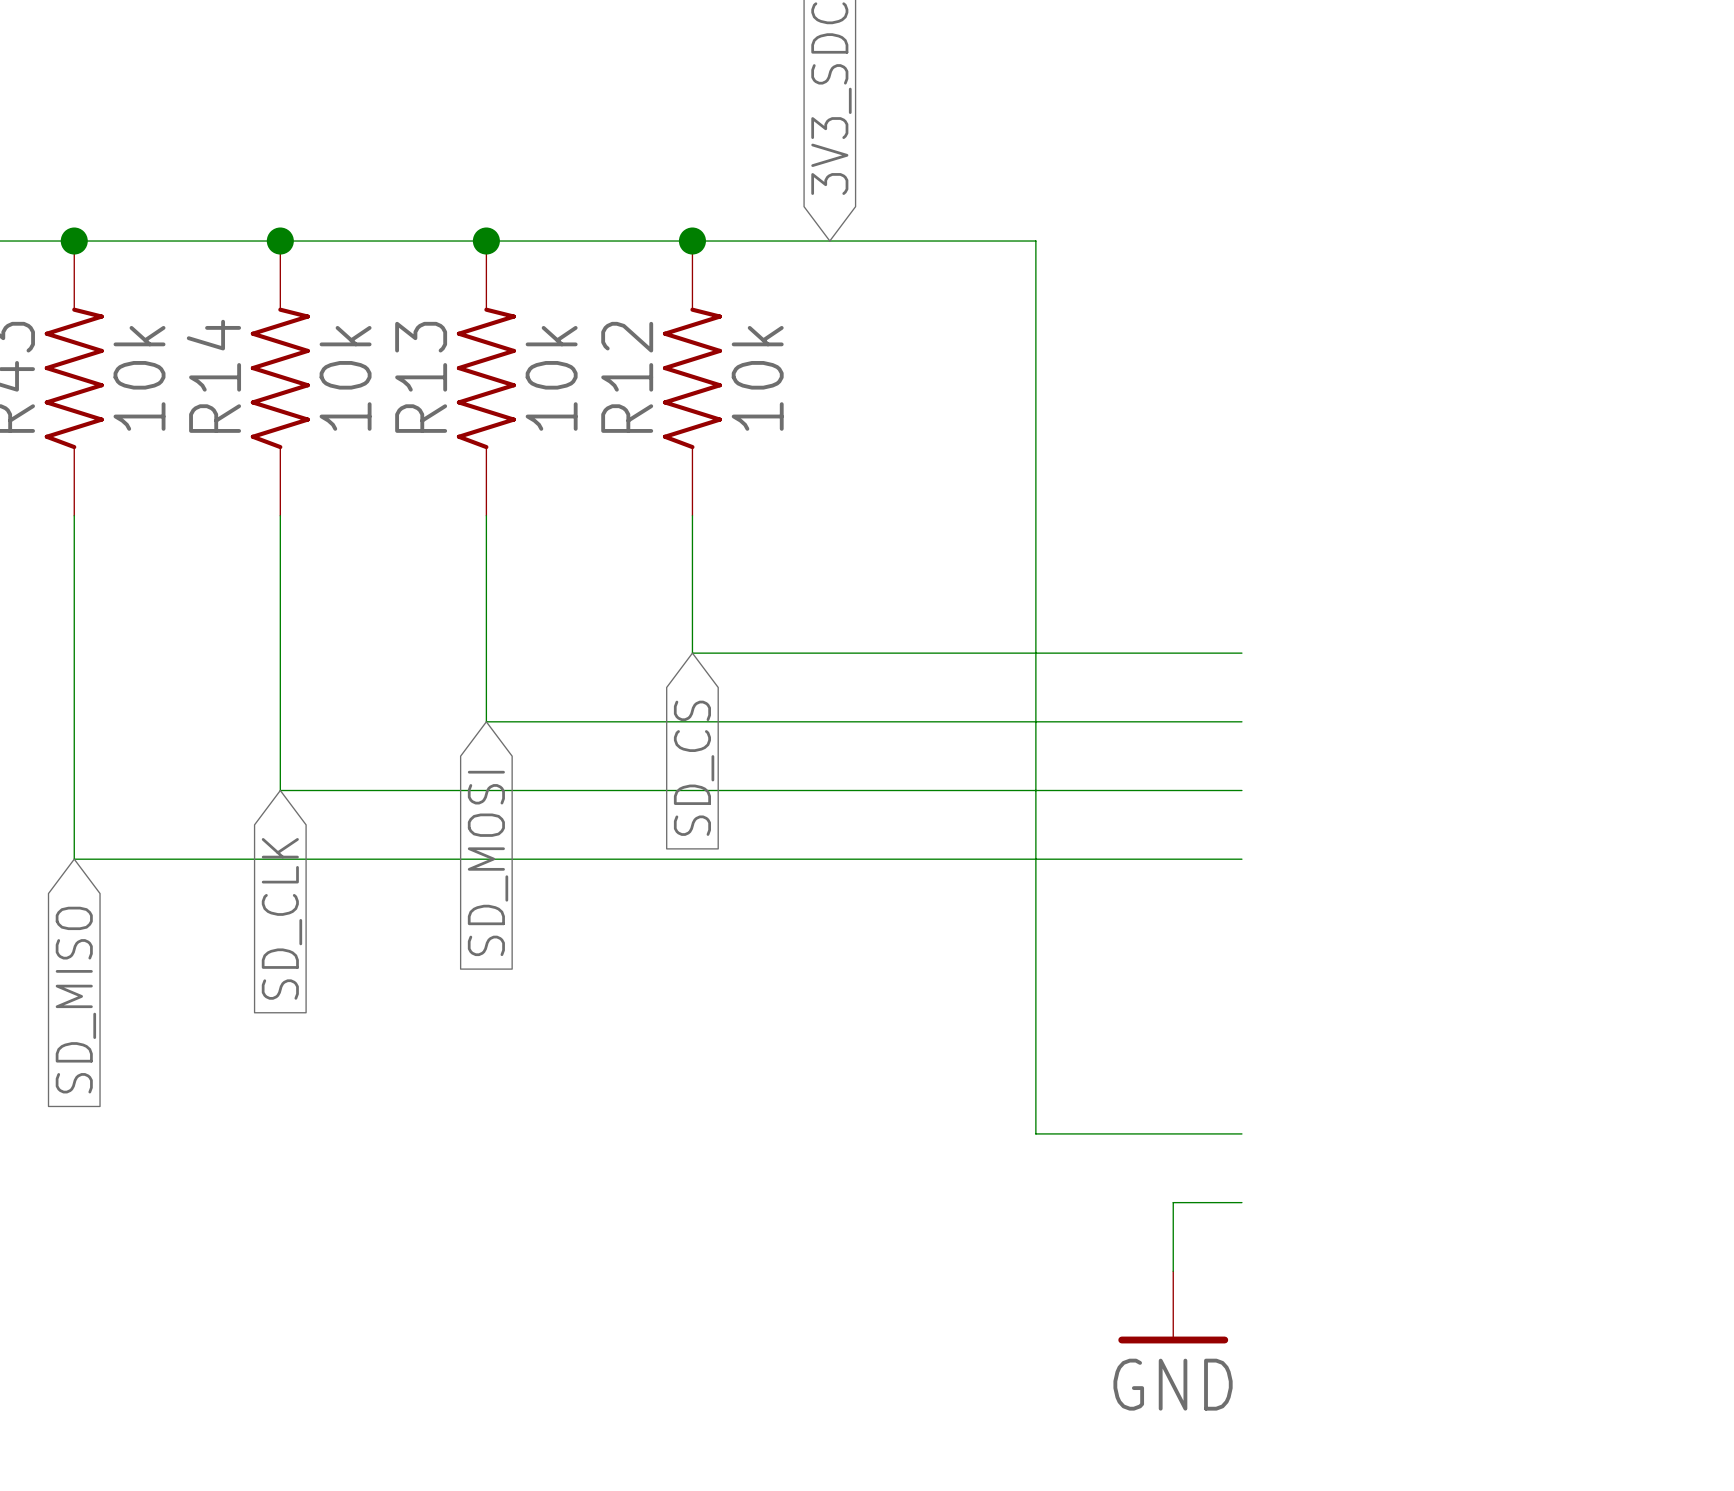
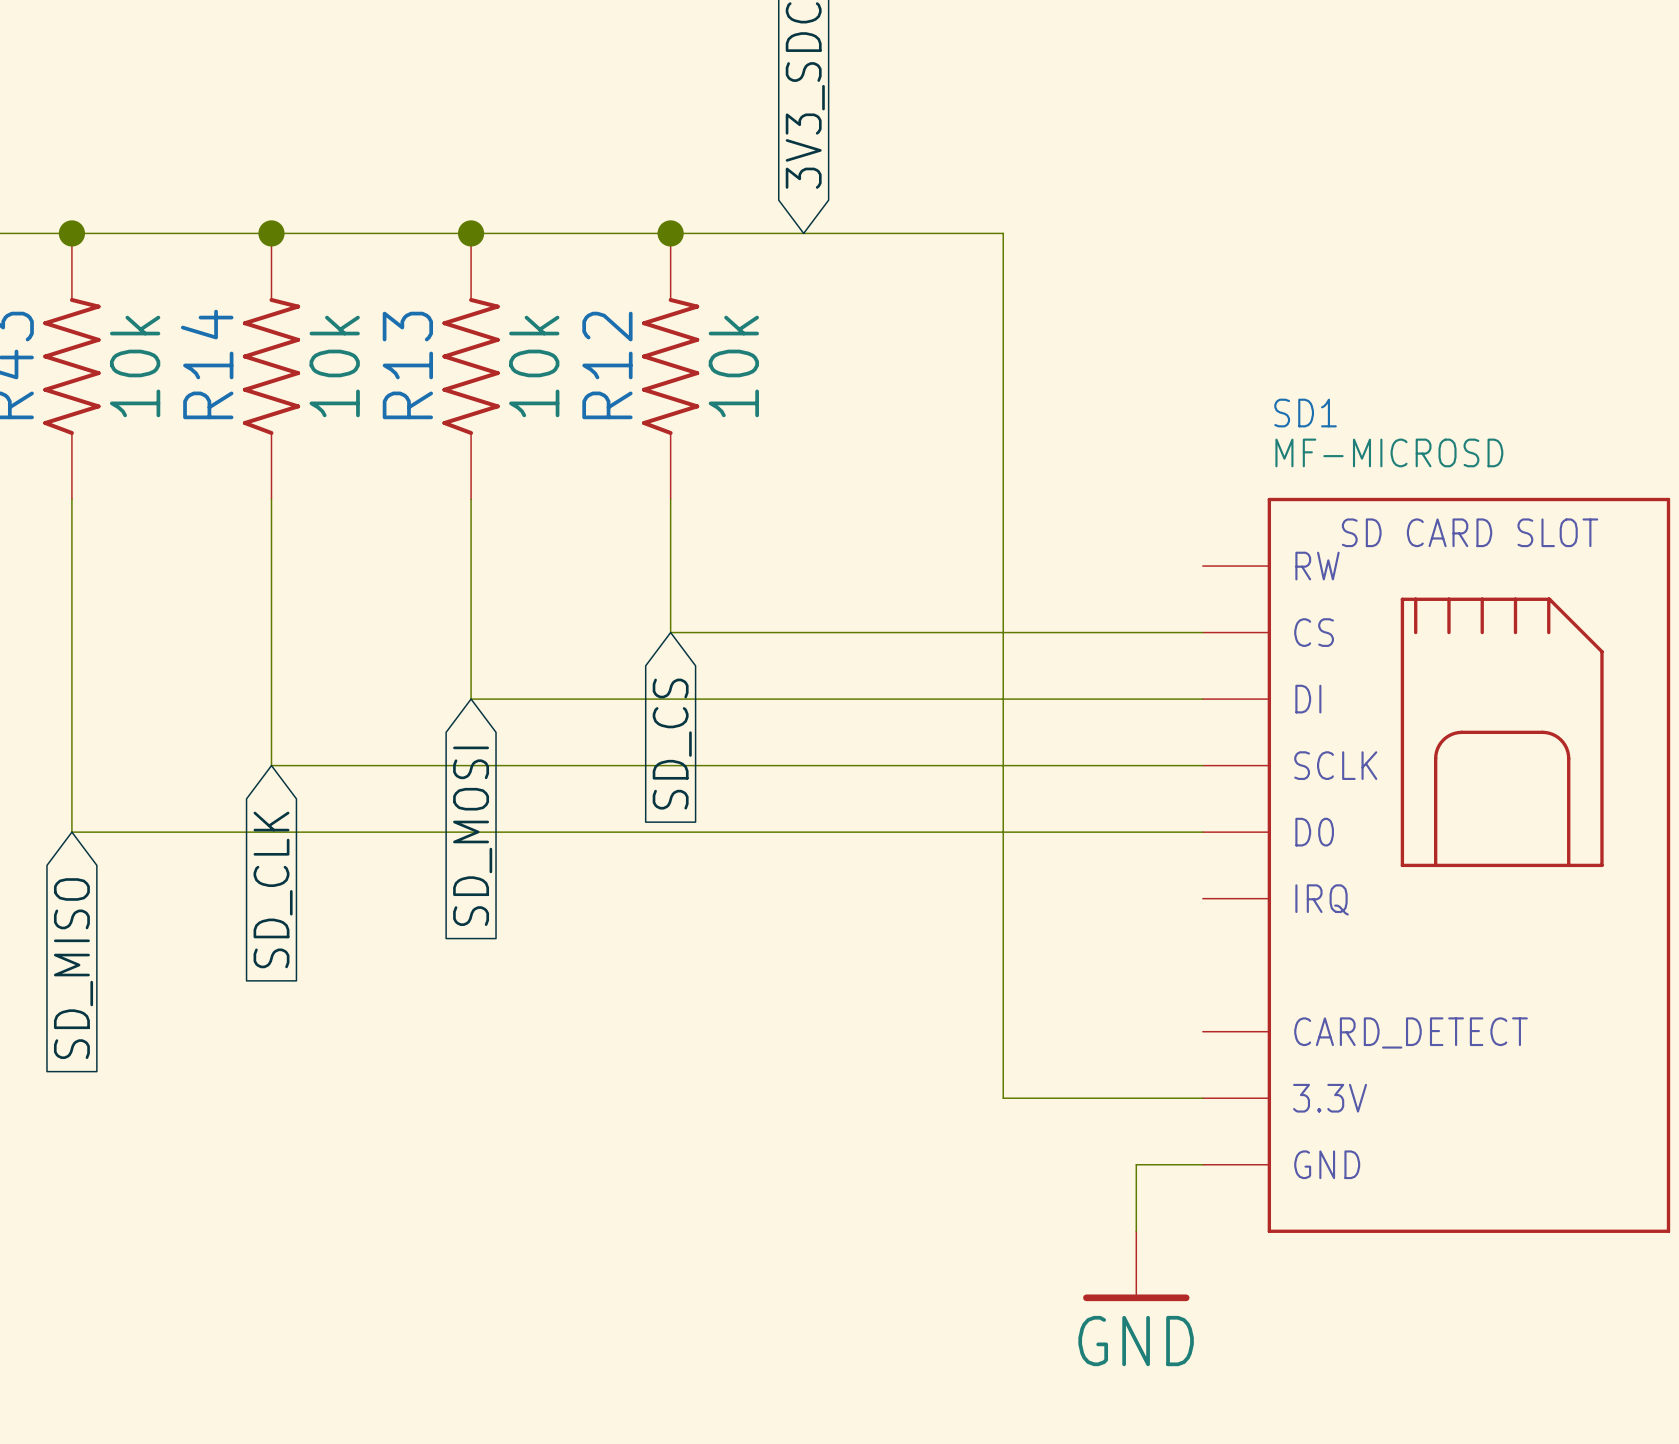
SD1: none -> MF-MICROSD (1436, 865)

